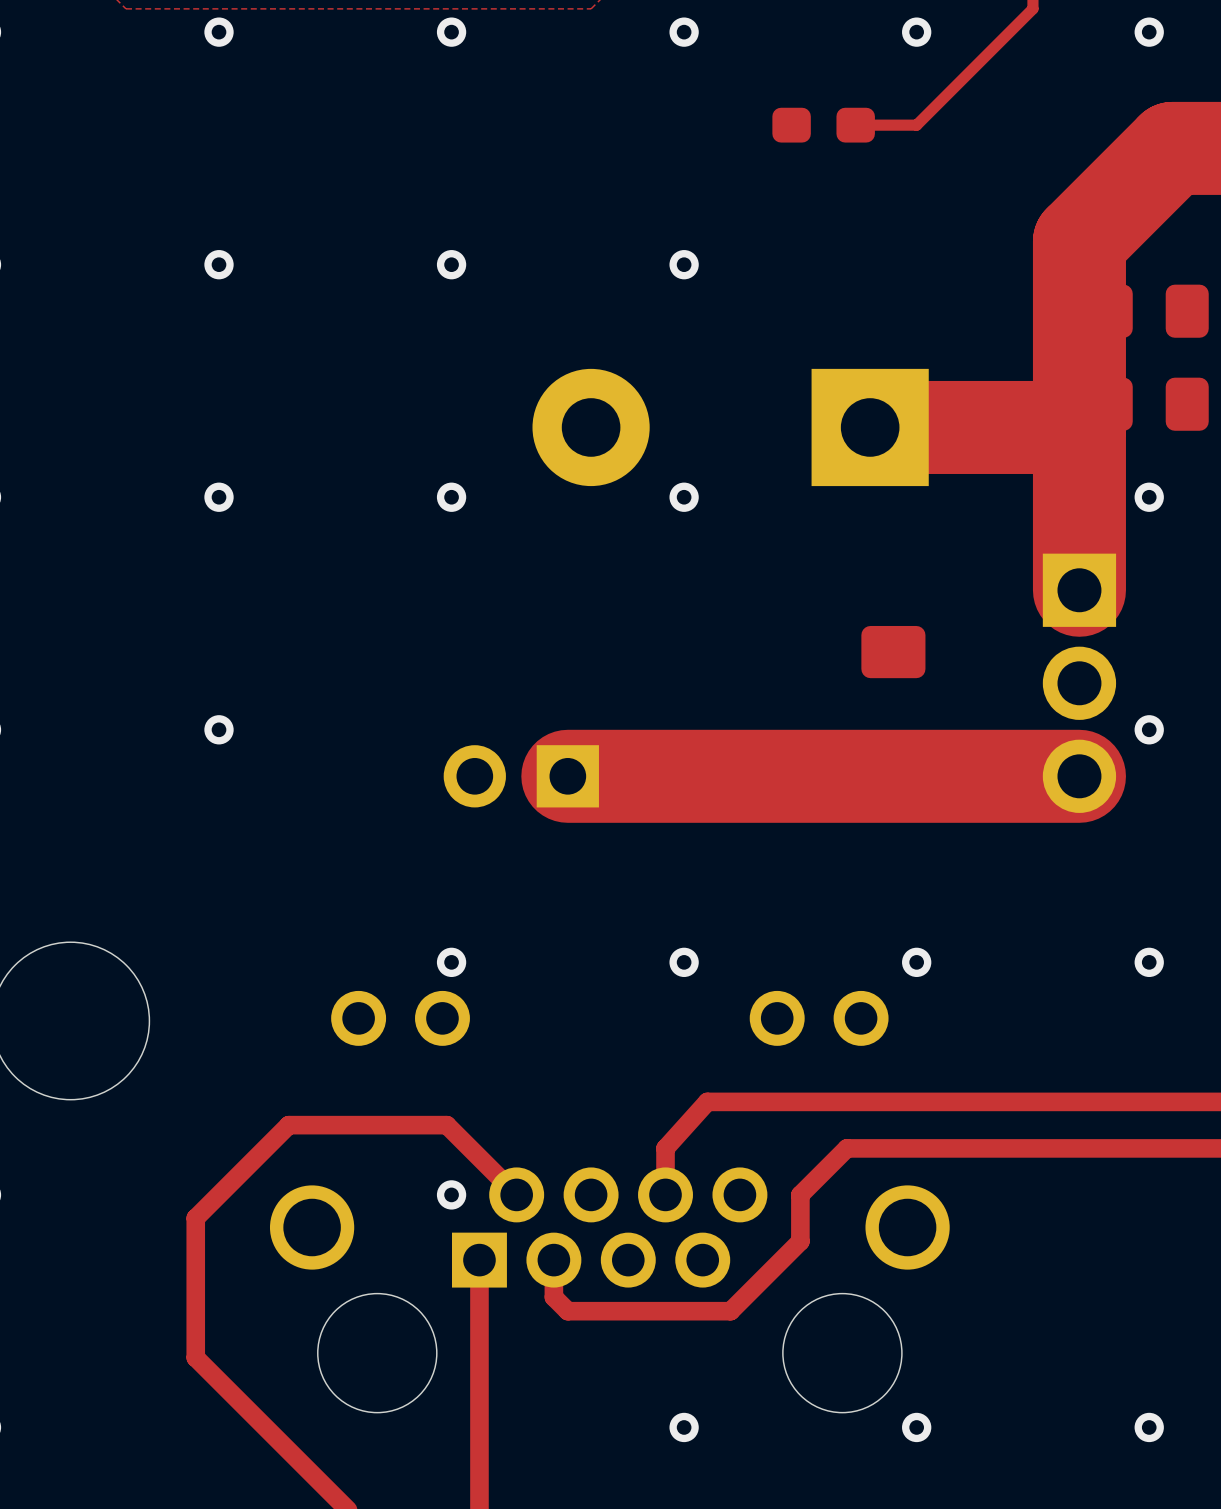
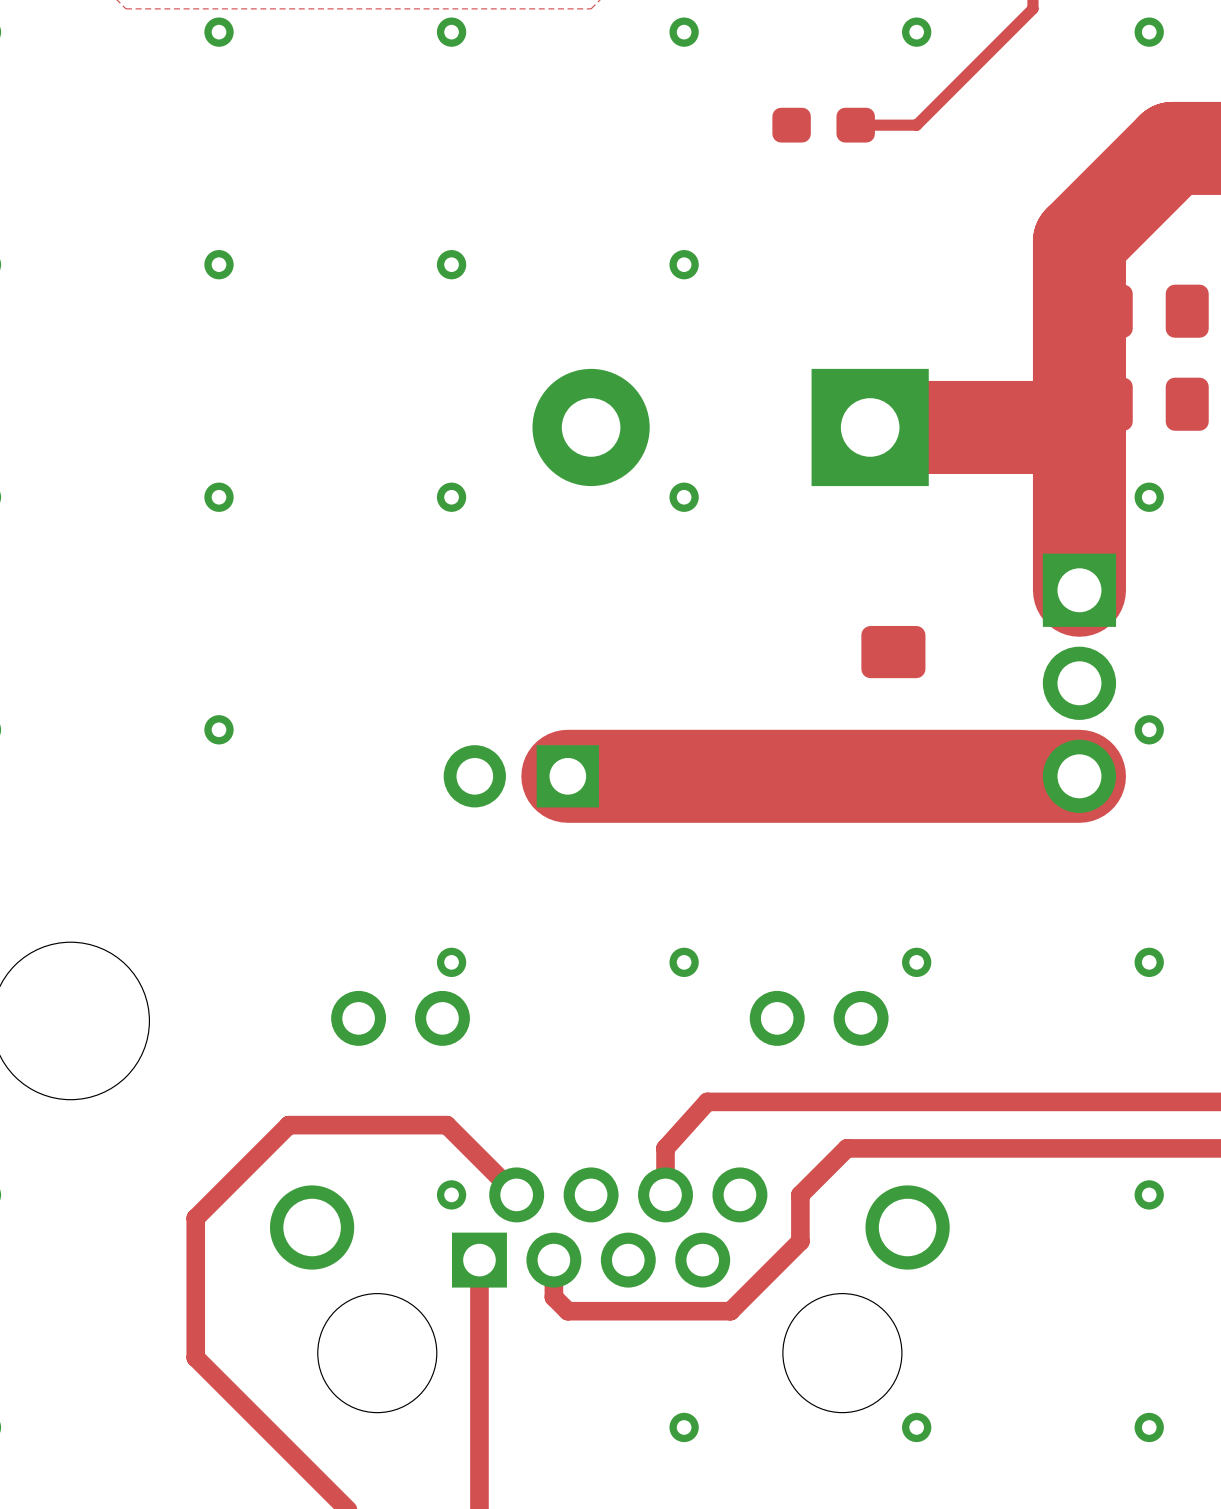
via: none -> (1149, 1194)

